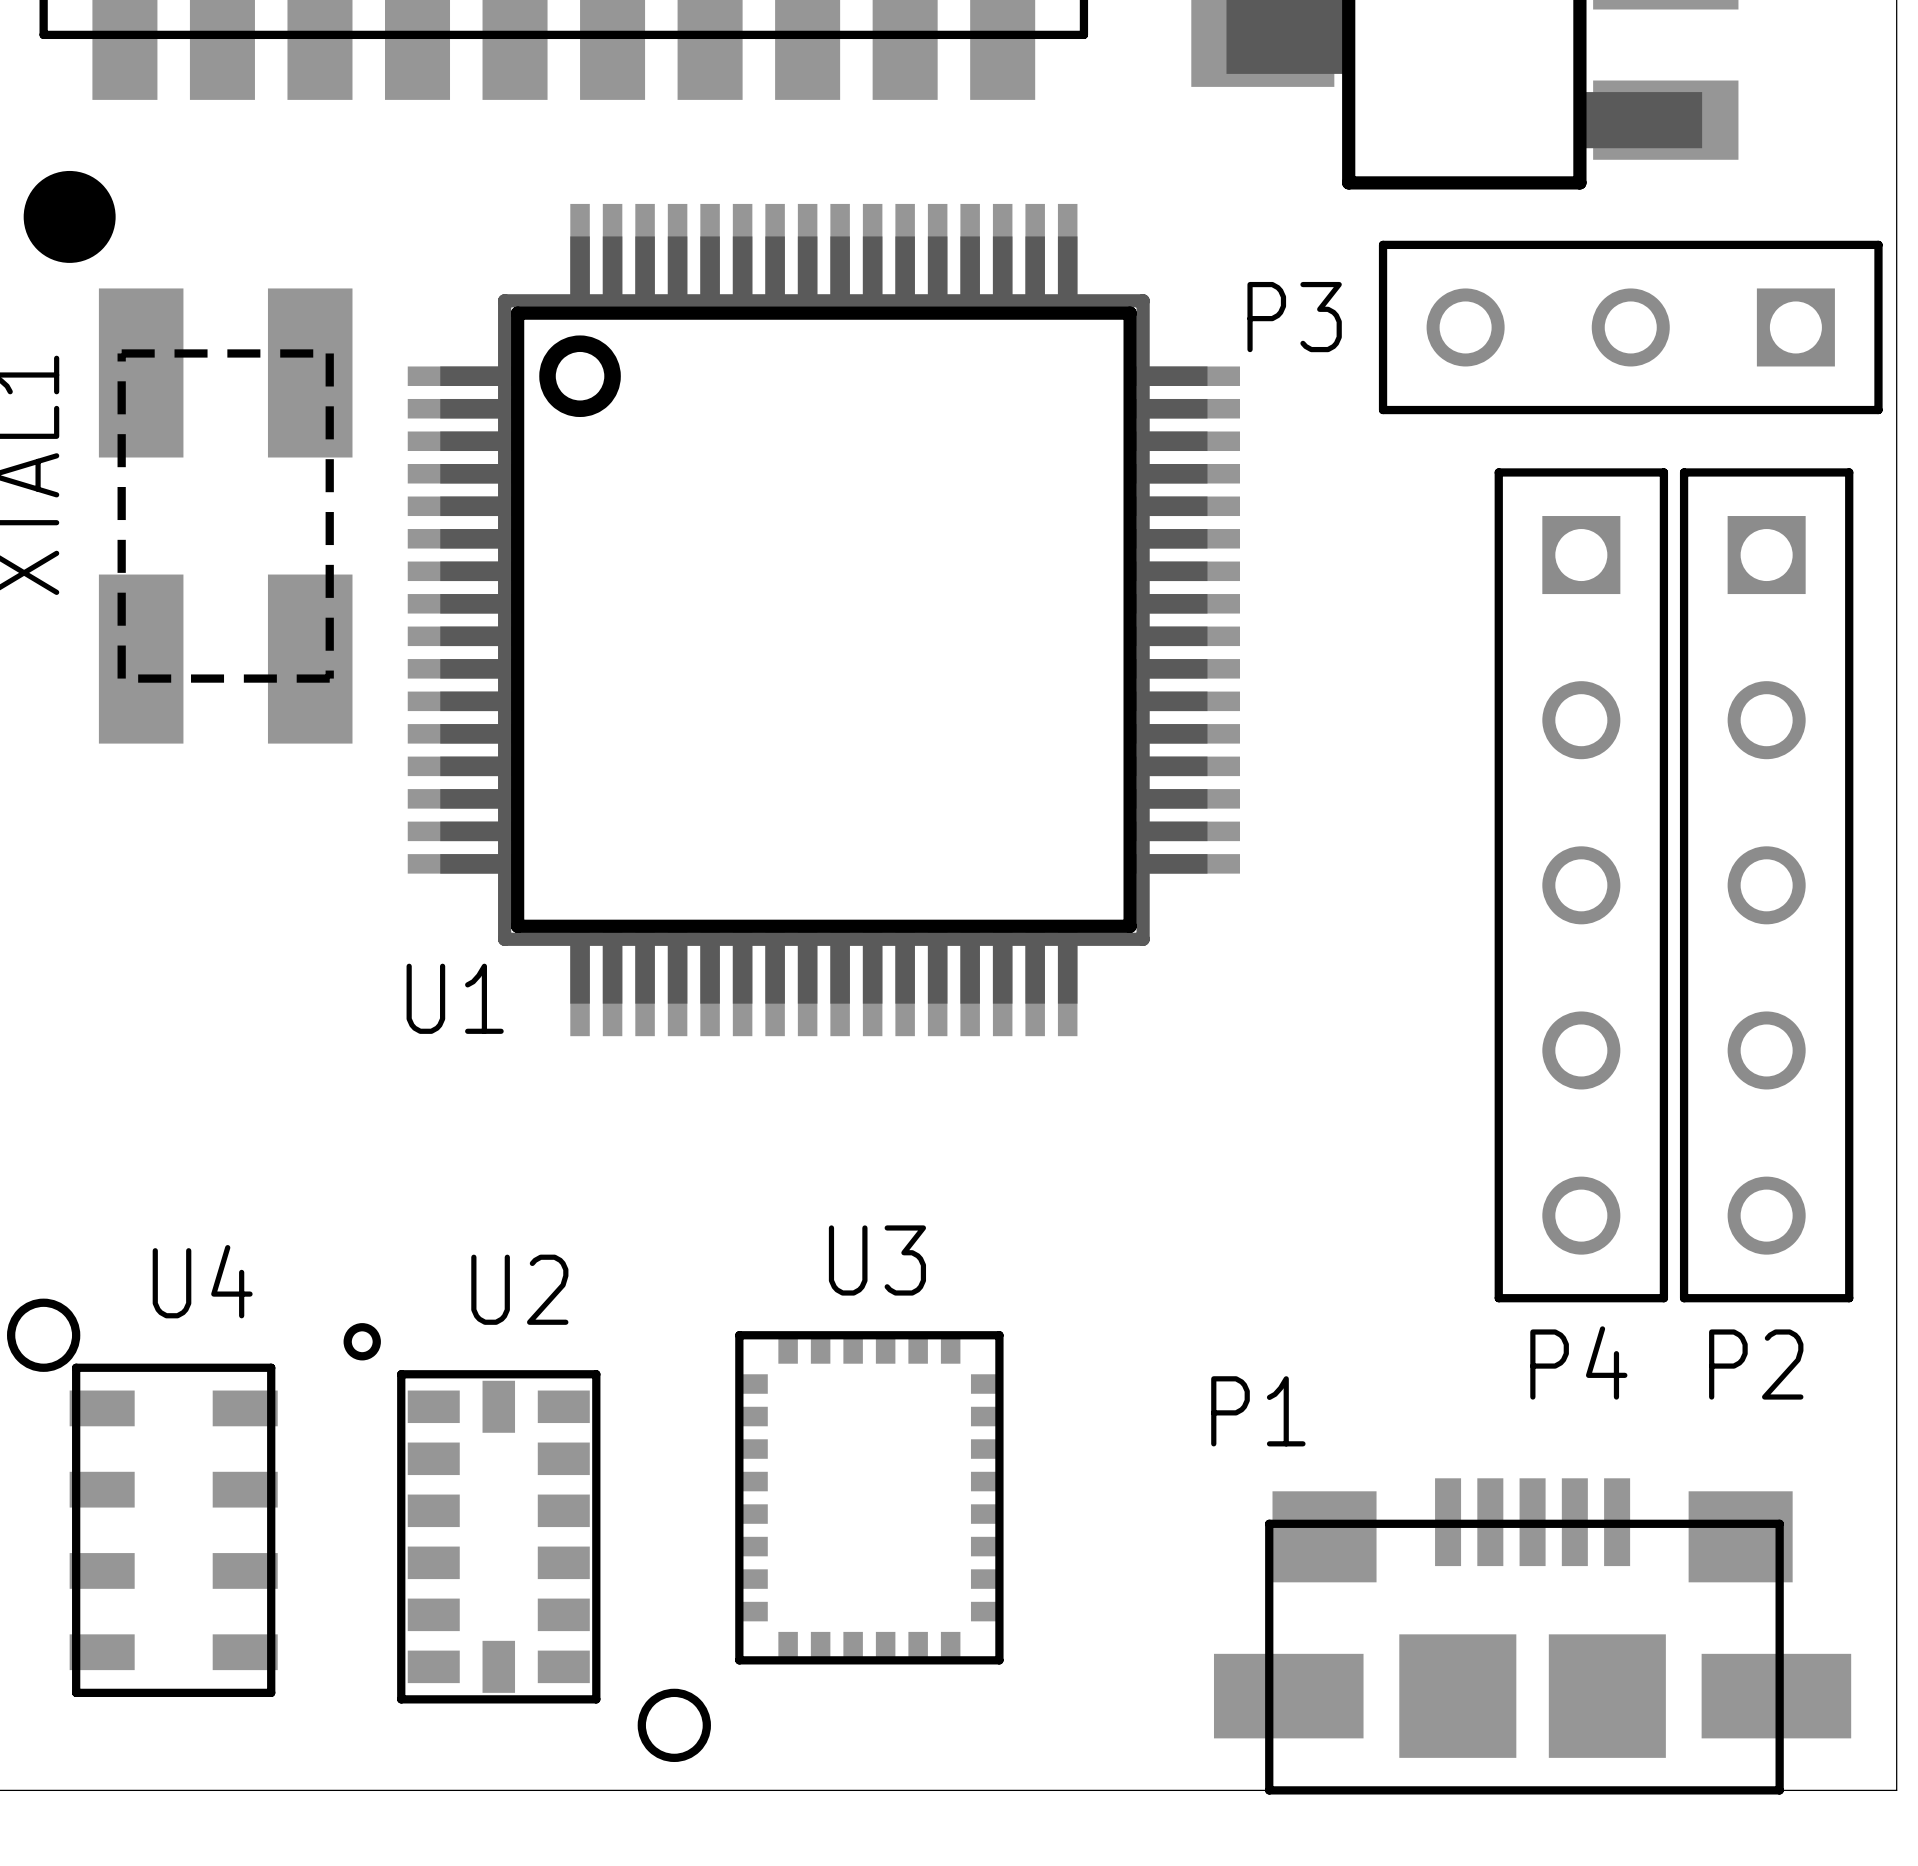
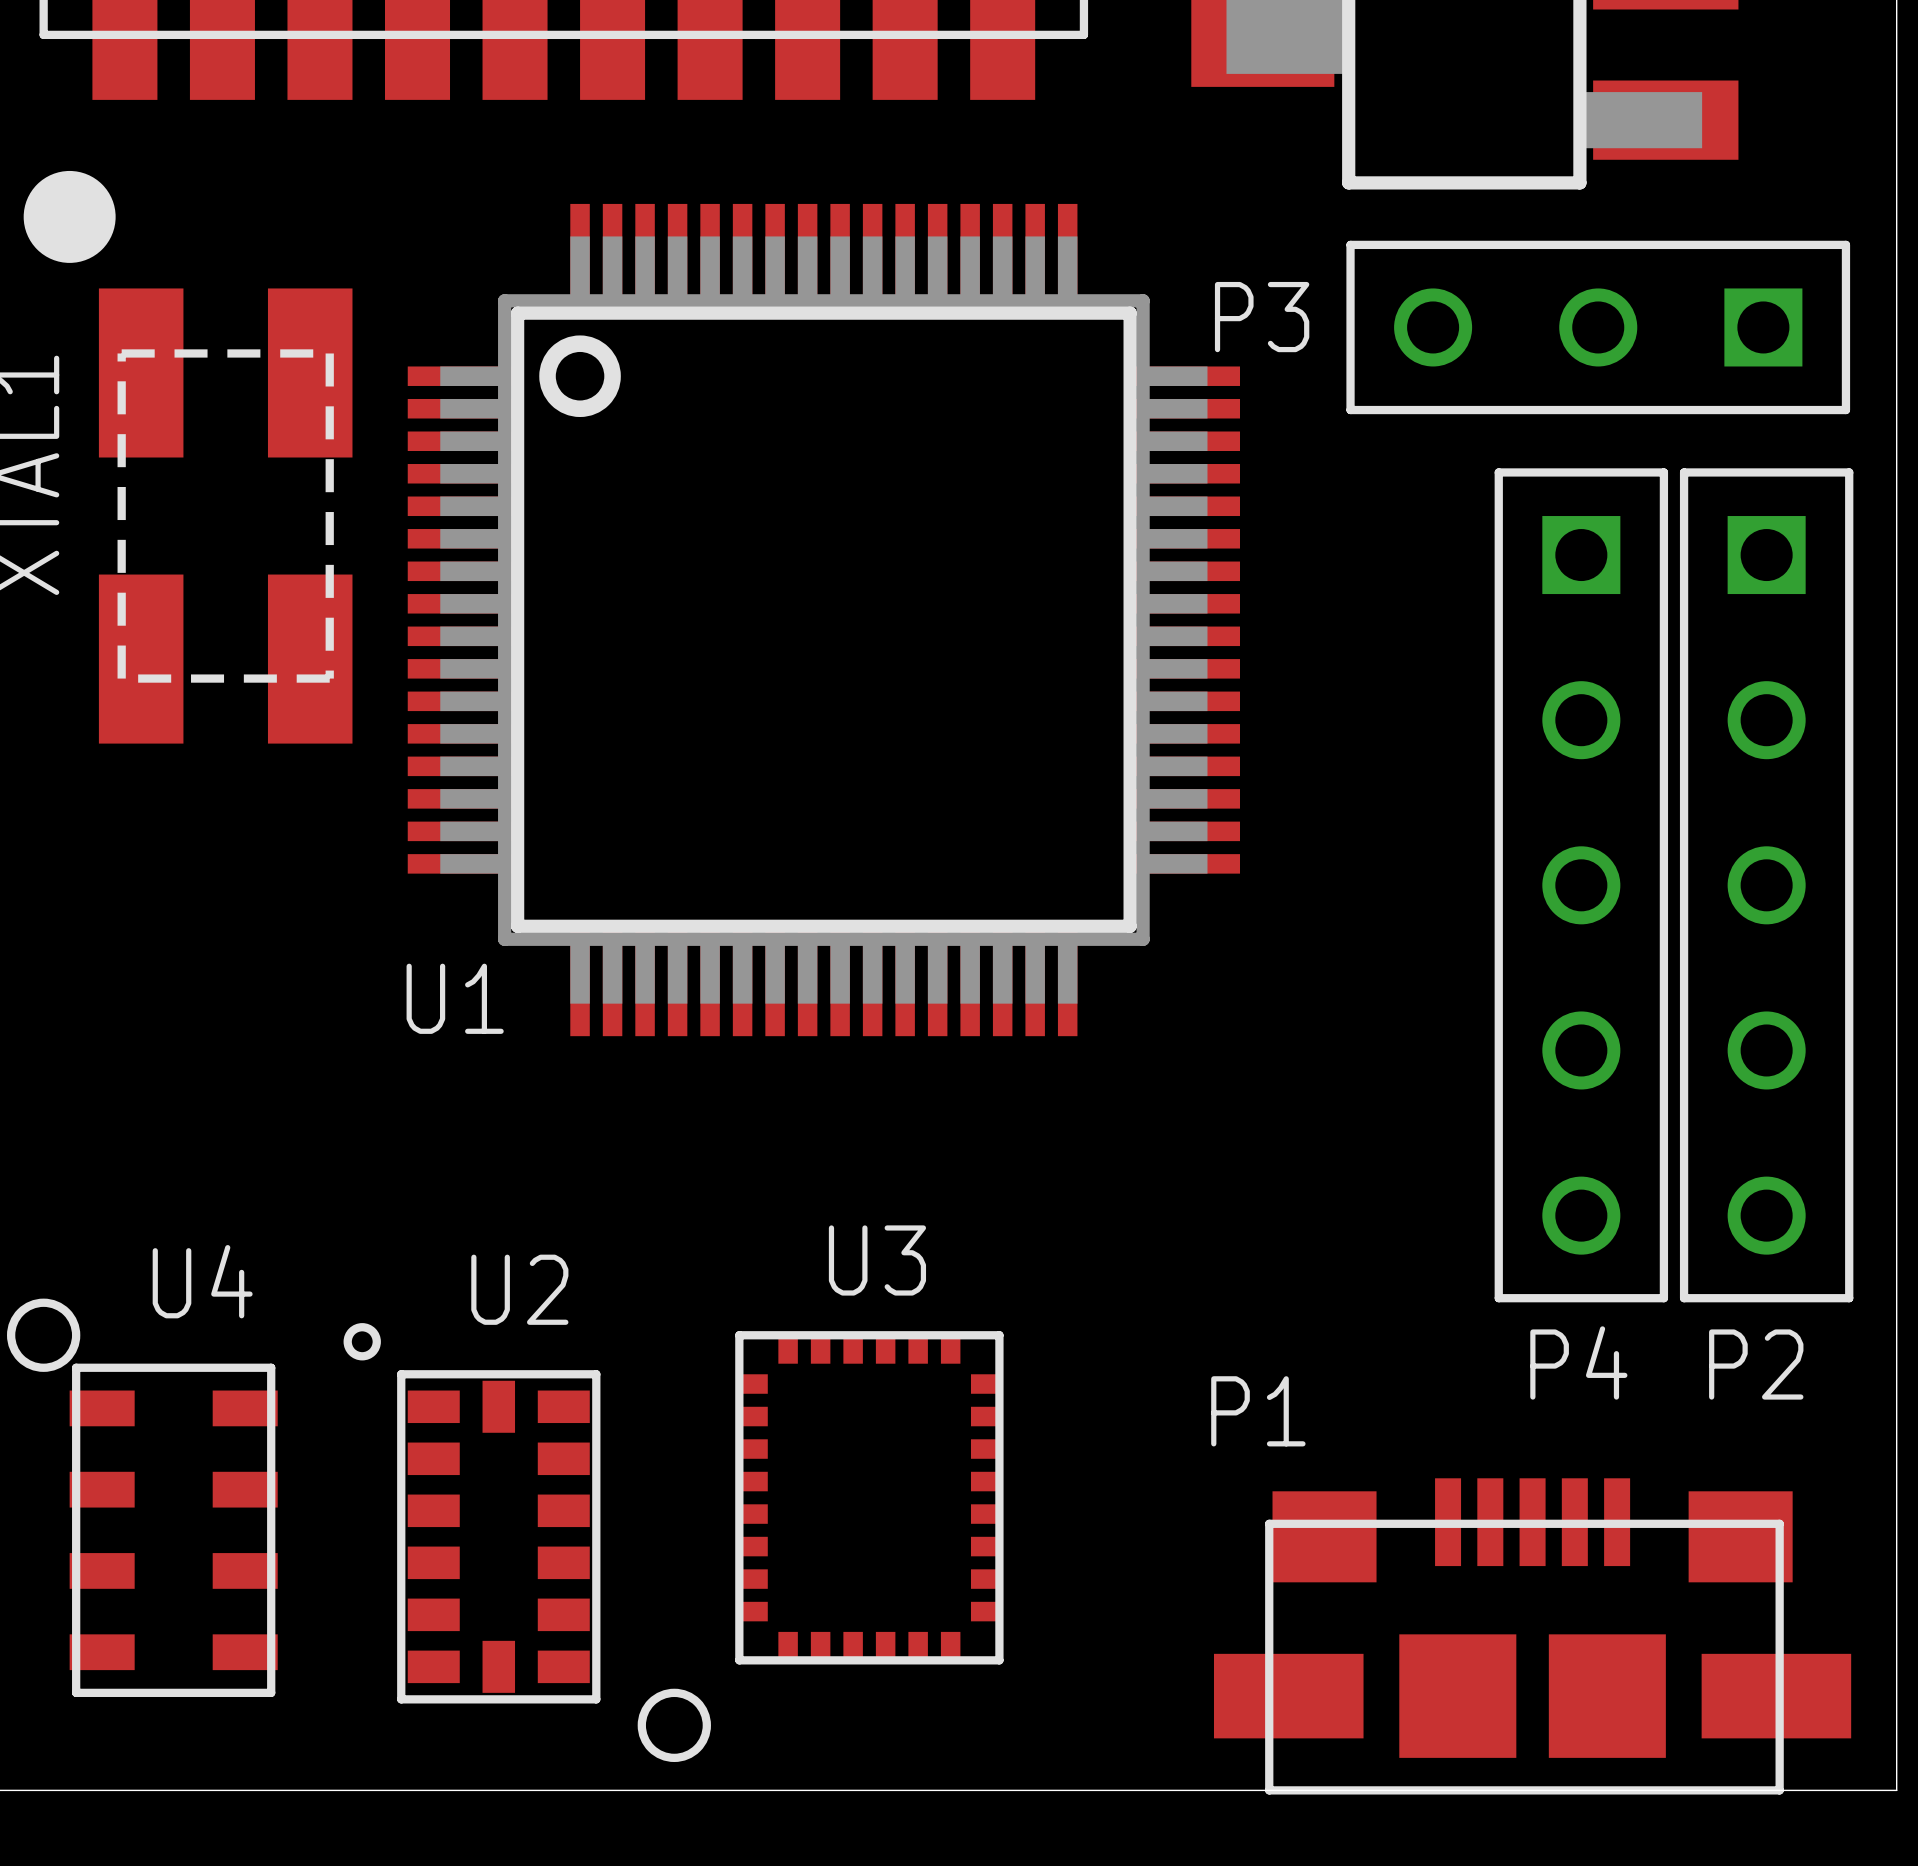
P3 position: (1630, 327) -> (1598, 327)

